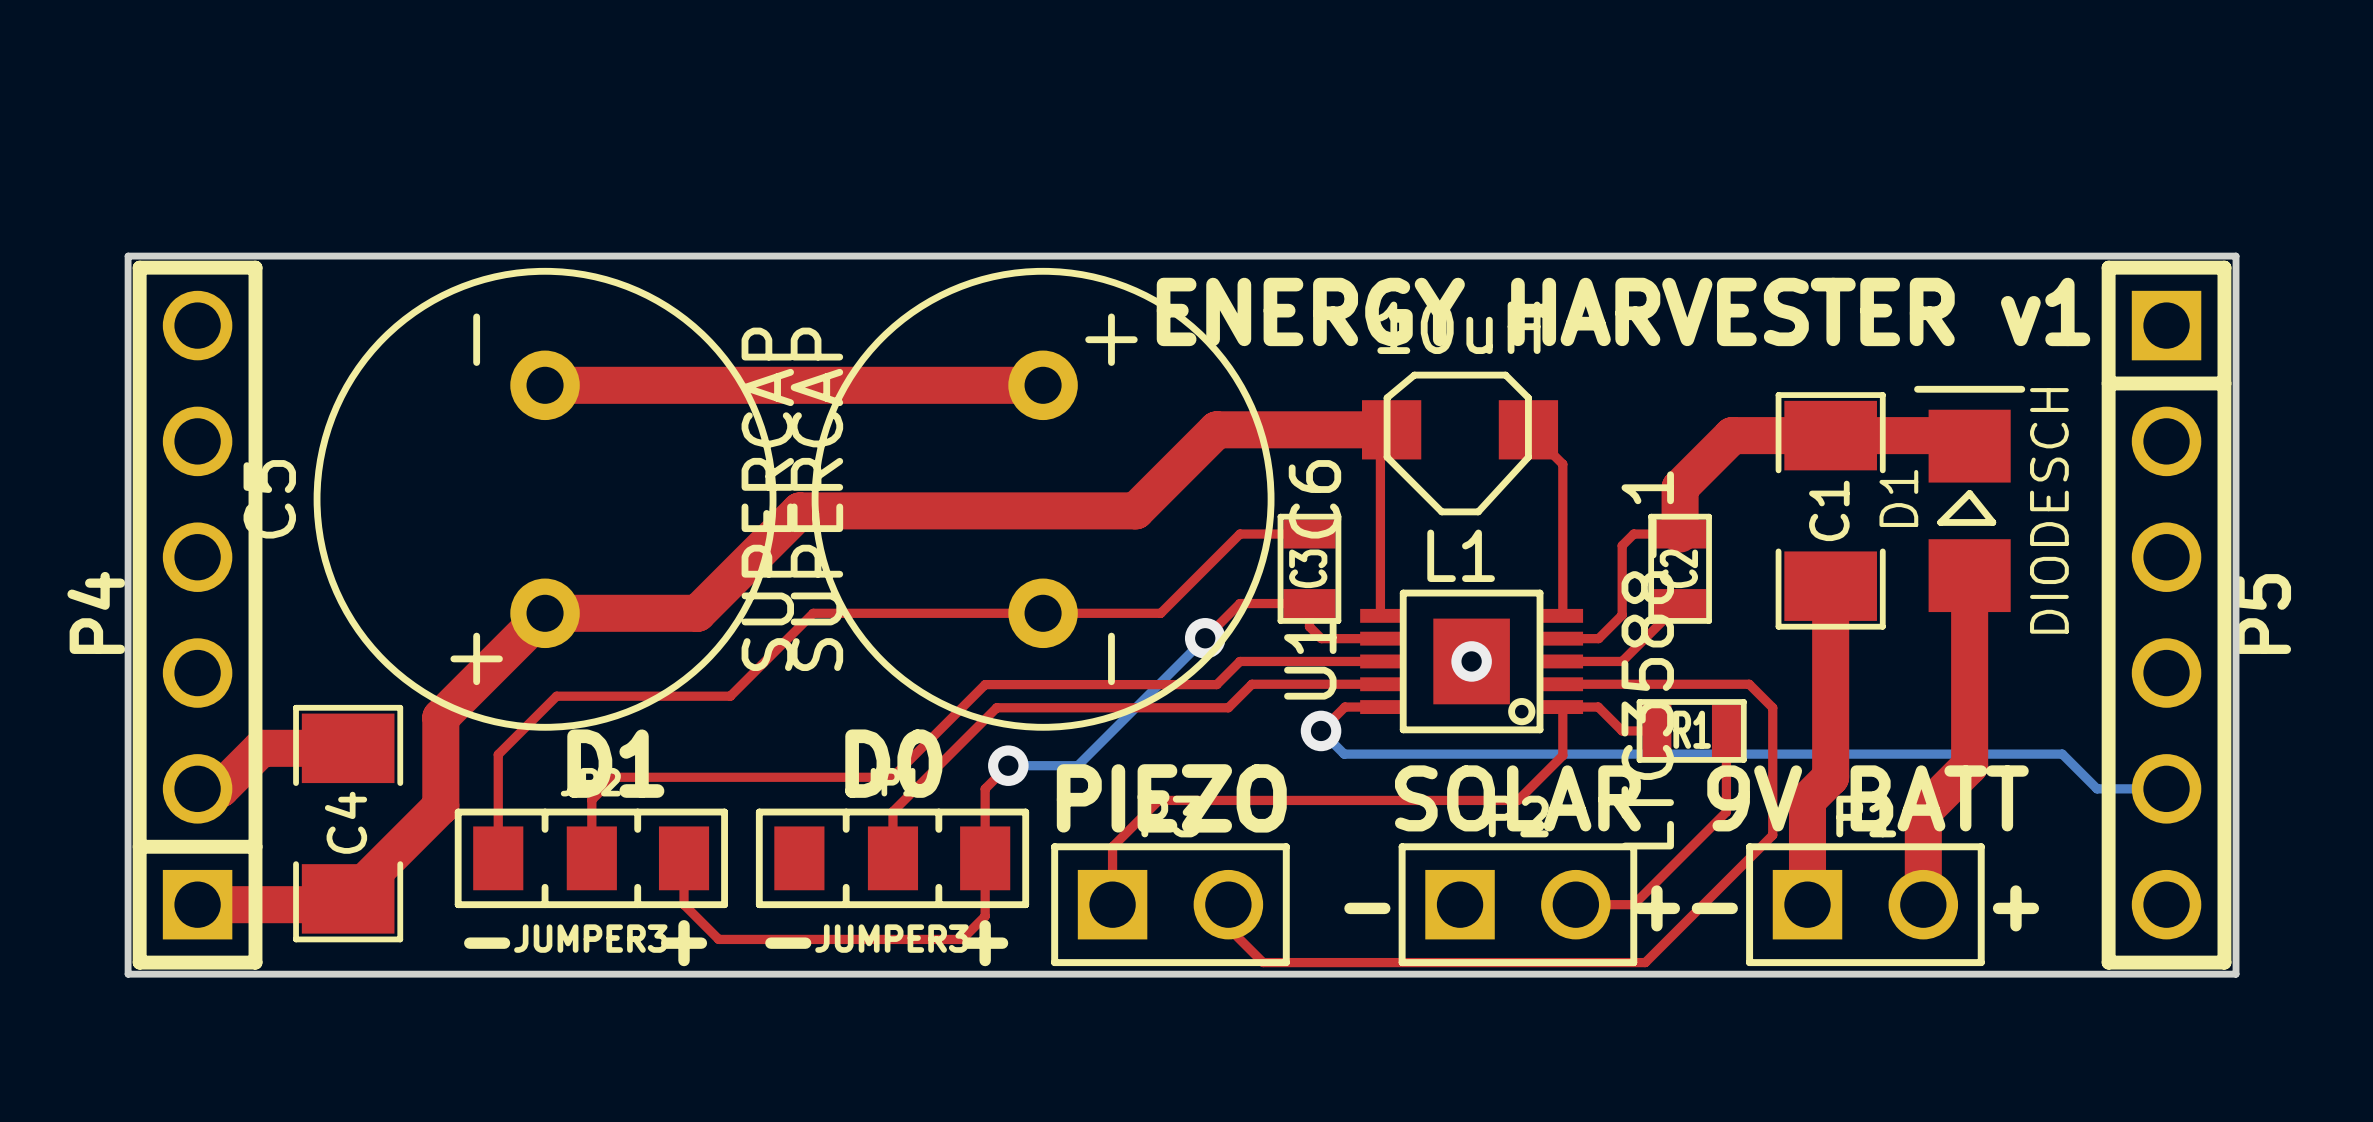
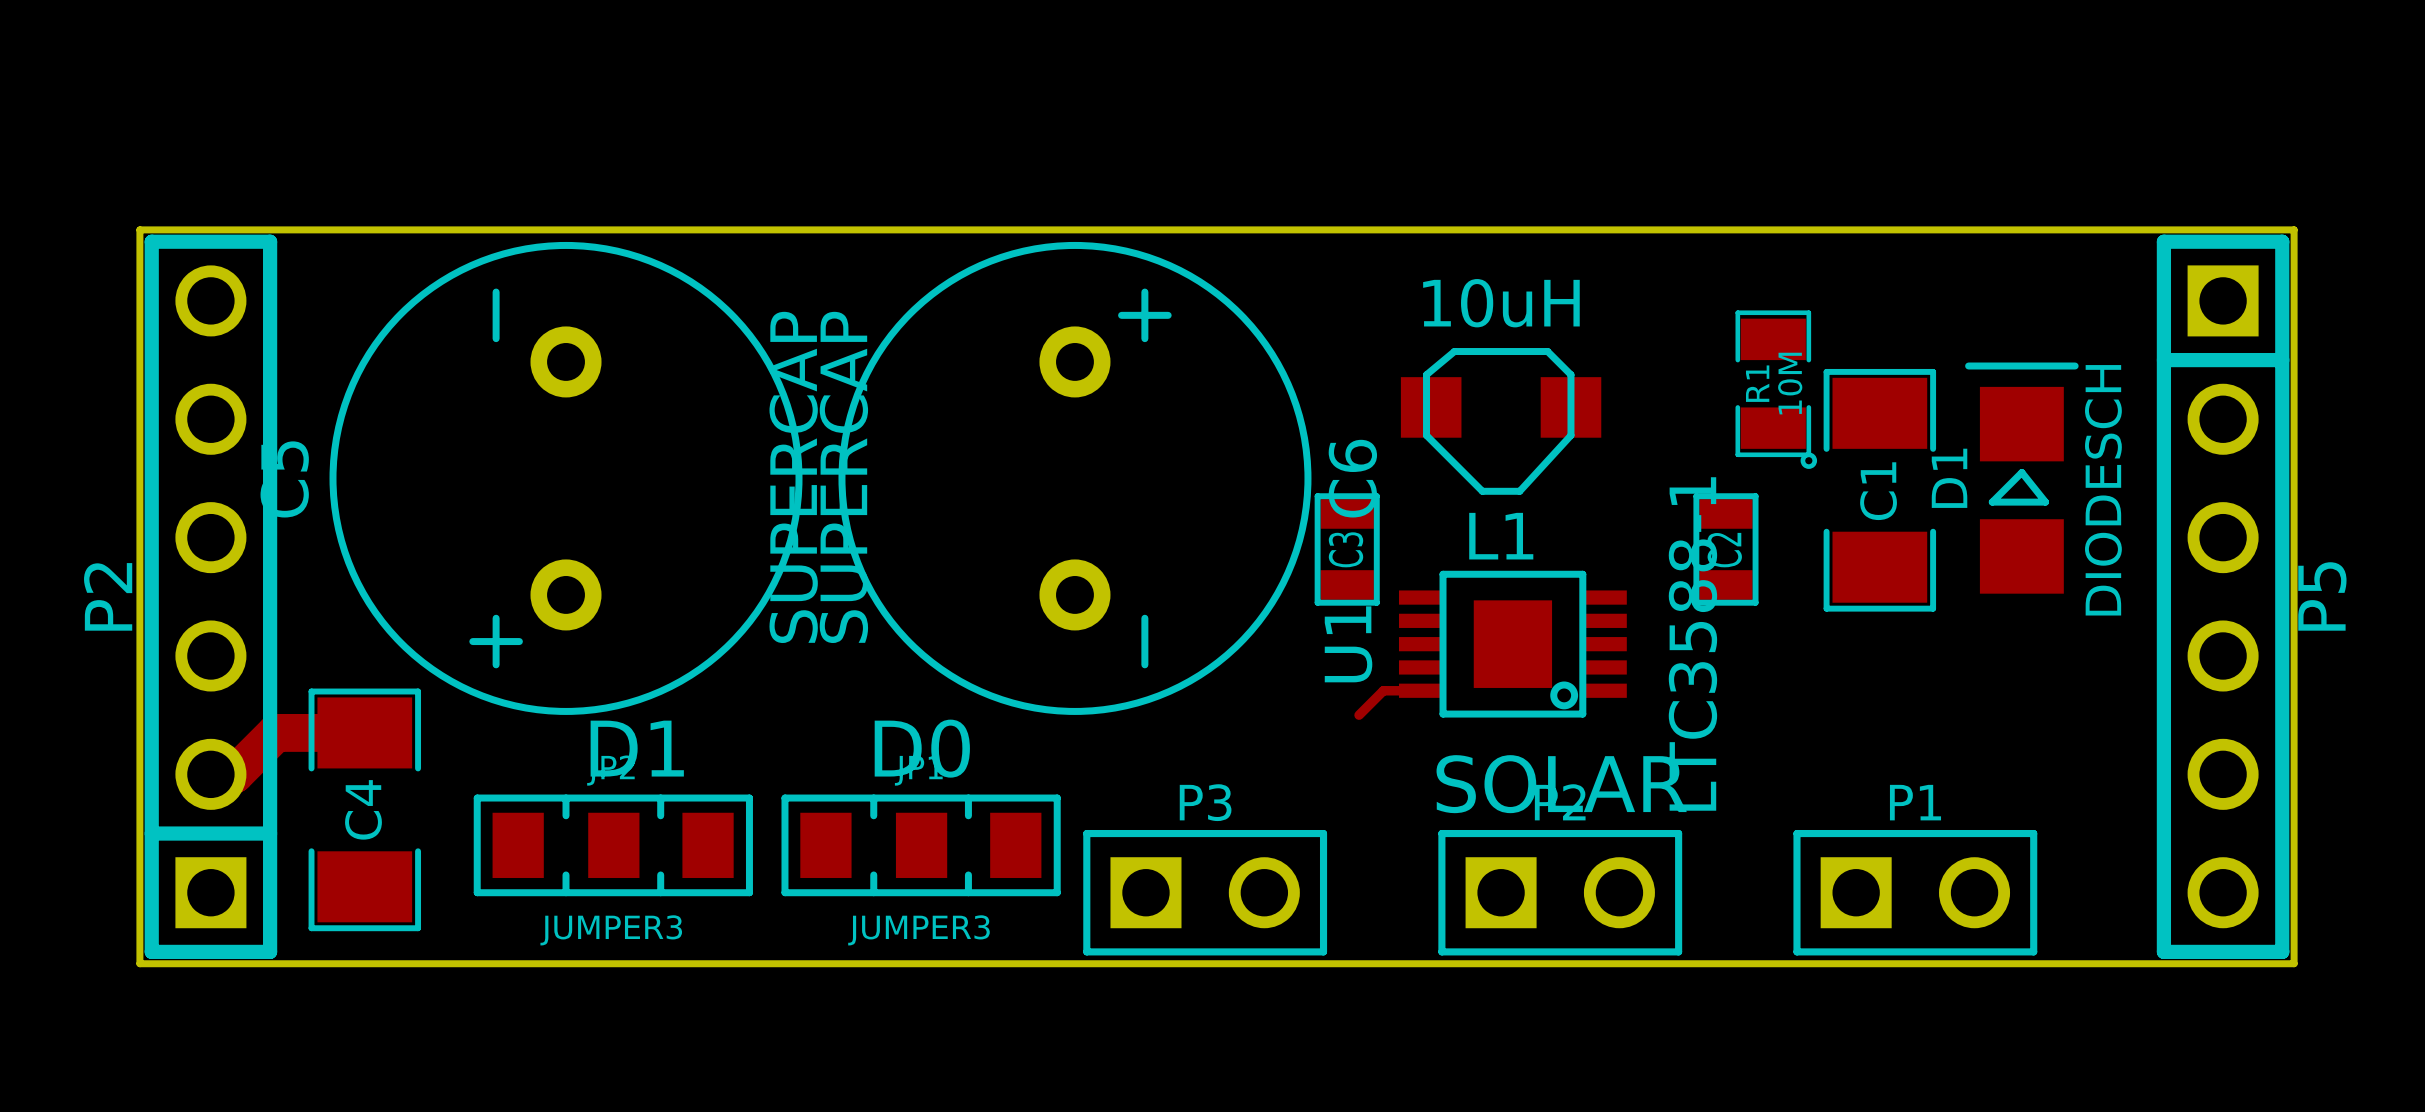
text: ENERGY HARVESTER v1 (1623, 311) -> none
top track: (545, 385) (1043, 385) -> none
R1 value: none -> 10M (1790, 383)
top track: (1528, 429) (1562, 464) (1562, 615) -> none
top track: (1969, 435) (1732, 435) (1680, 487) (1680, 534) (1633, 534) (1622, 545) (1622, 615) (1598, 638) (1562, 638) -> none
top track: (1309, 534) (1239, 534) (1160, 613) (813, 613) (730, 696) (556, 696) (498, 754) (498, 858) -> none
top track: (1830, 586) (1830, 777) (1807, 800) (1807, 904) -> none
top track: (1969, 586) (1969, 765) (1923, 812) (1923, 904) -> none
top track: (1680, 603) (1622, 661) (1562, 661) -> none
P4 name: P4 (96, 612) -> P2 (108, 596)
top track: (1380, 615) (1380, 441) (1391, 429) (1216, 429) (1135, 510) (799, 510) (697, 613) (545, 613) (440, 717) (440, 806) (342, 904) (197, 904) -> none
top track: (1205, 638) (1239, 603) (1309, 603) (1309, 626) (1321, 638) (1380, 638) -> none
bottom track: (1205, 638) (1077, 765) (1008, 765) -> none
via: (1205, 638) -> none
top track: (1380, 661) (1239, 661) (1216, 684) (985, 684) (892, 777) (614, 777) (591, 799) (591, 858) -> none
via: (1471, 661) -> none
top track: (1380, 684) (1251, 684) (1228, 707) (996, 707) (892, 811) (892, 858) -> none
top track: (1562, 684) (1749, 684) (1772, 707) (1772, 835) (1645, 962) (1263, 962) (1228, 927) (1228, 904) -> none
R1 footprint: [1636, 699, 1747, 763] -> [1735, 310, 1818, 469]
bottom track: (1321, 730) (1344, 754) (2062, 754) (2097, 788) (2166, 788) -> none
via: (1321, 730) -> none
top track: (1656, 730) (1622, 730) (1598, 707) (1562, 707) (1562, 755) (1517, 800) (1158, 800) (1112, 846) (1112, 904) -> none
top track: (1726, 730) (1726, 812) (1633, 904) (1575, 904) -> none
top track: (1008, 765) (985, 788) (985, 916) (962, 939) (718, 939) (684, 904) (684, 858) -> none
via: (1008, 765) -> none
text: PIEZO (1171, 798) -> none
text: 9V BATT (1868, 798) -> none
text: - (1367, 908) -> none
text: + (1656, 908) -> none
text: - (1714, 908) -> none
text: + (2015, 908) -> none
text: - (487, 943) -> none
text: + (684, 943) -> none
text: - (788, 943) -> none
text: + (985, 943) -> none

